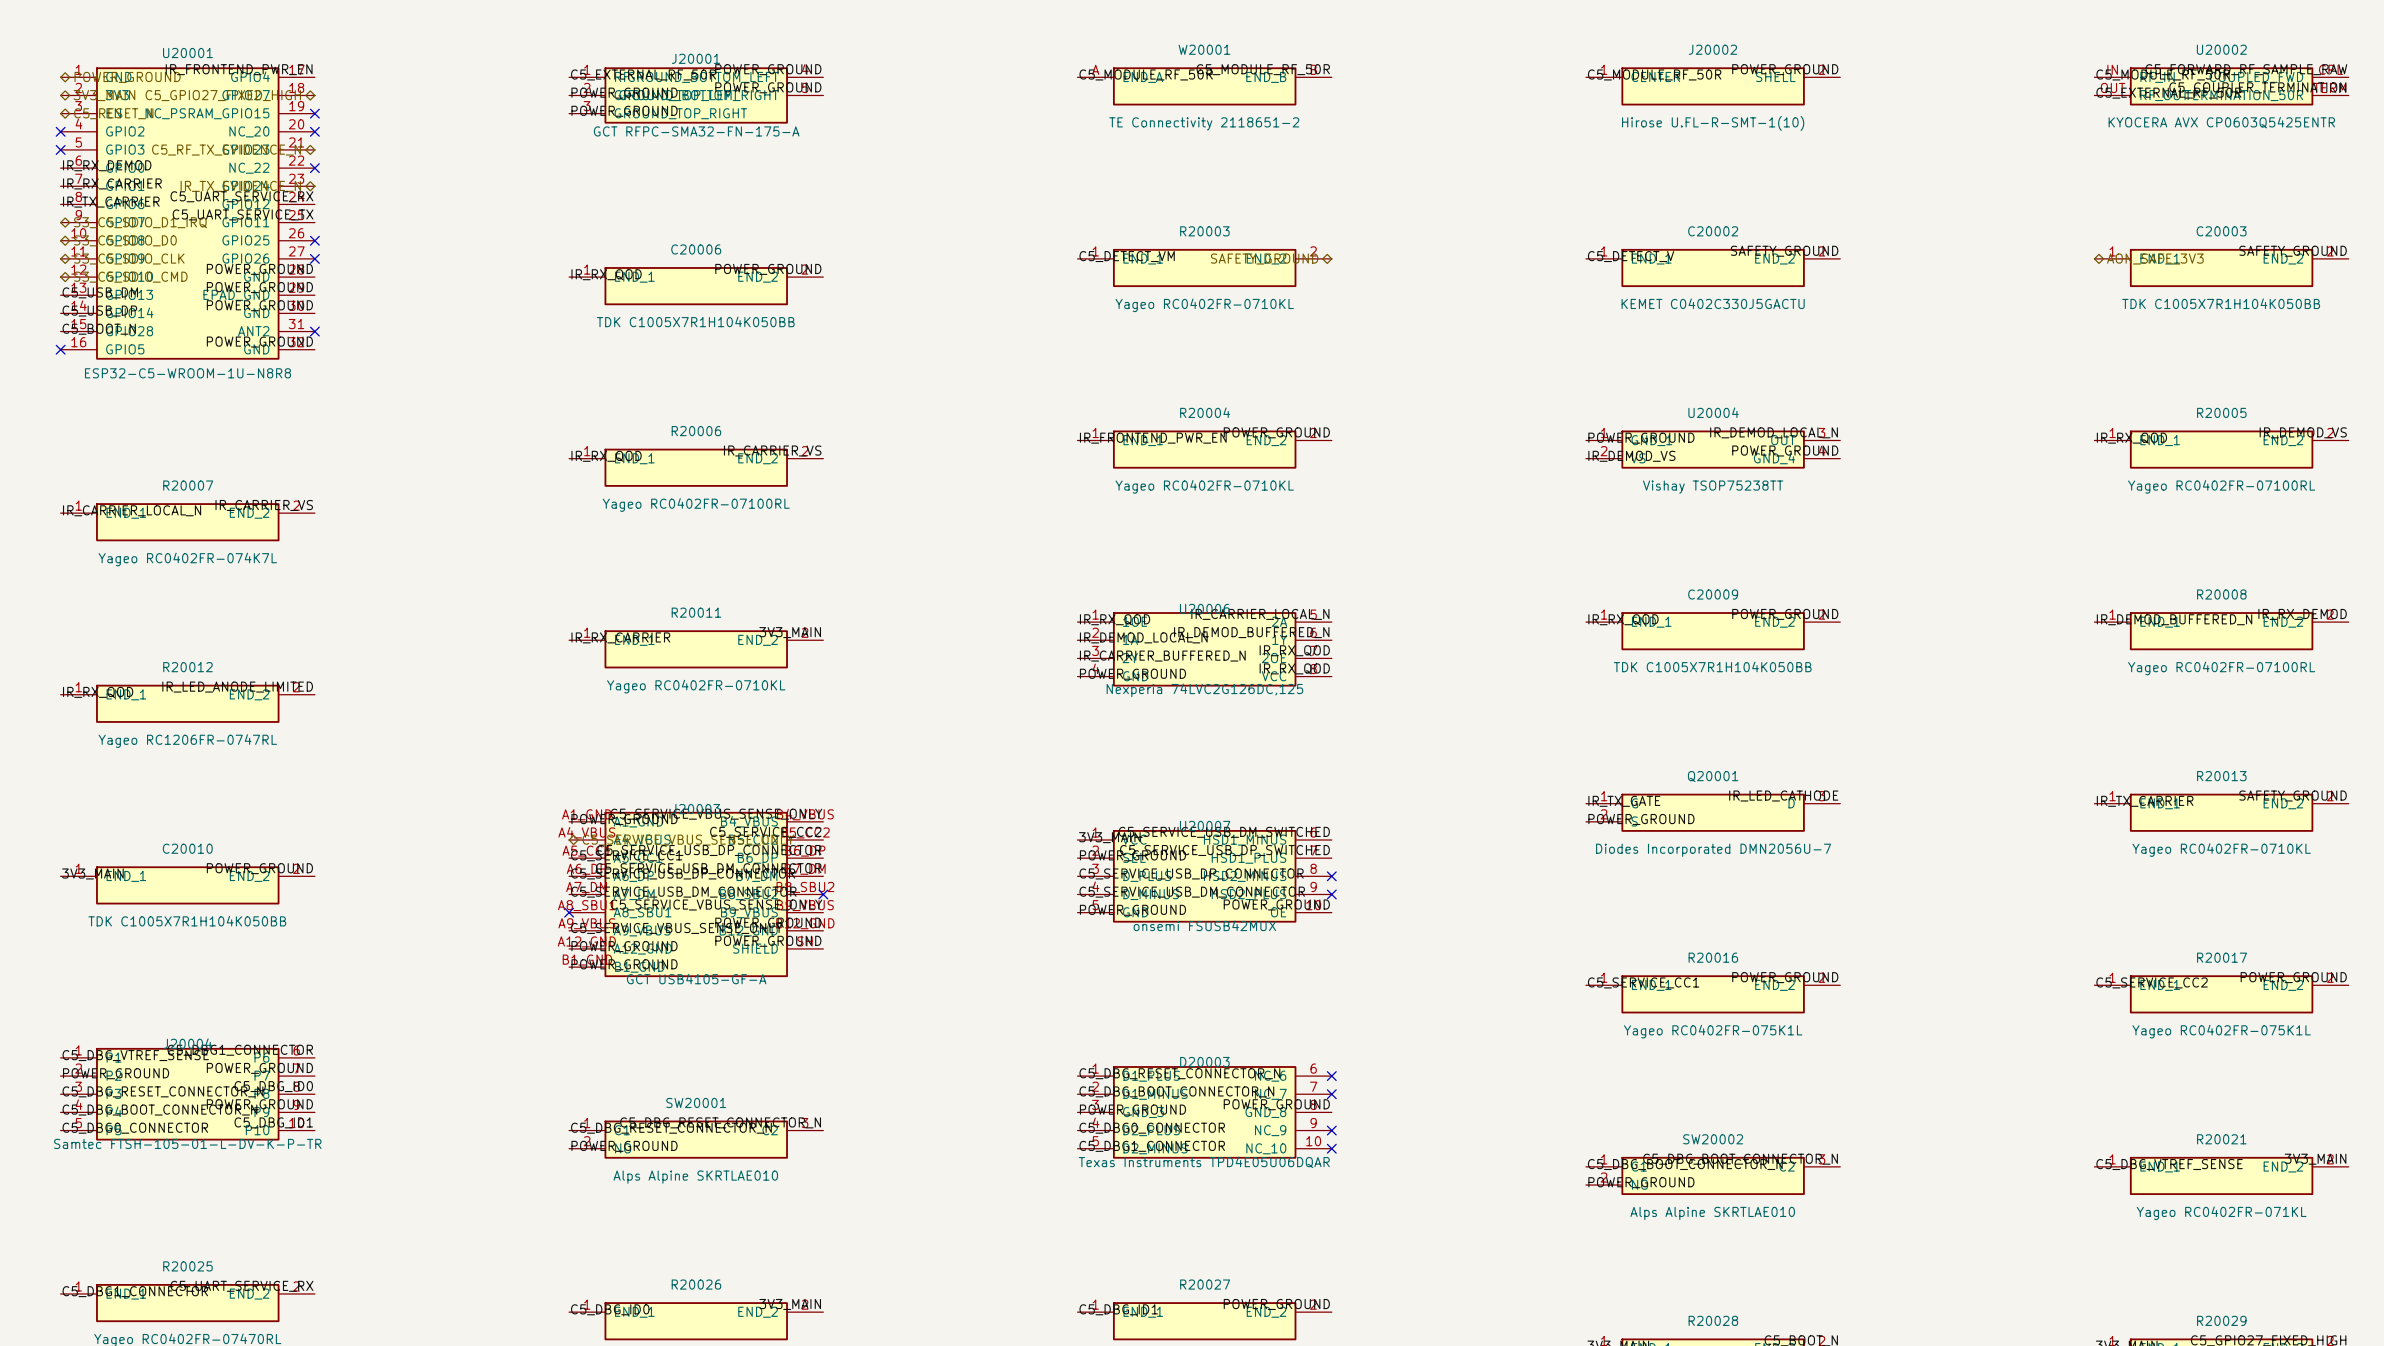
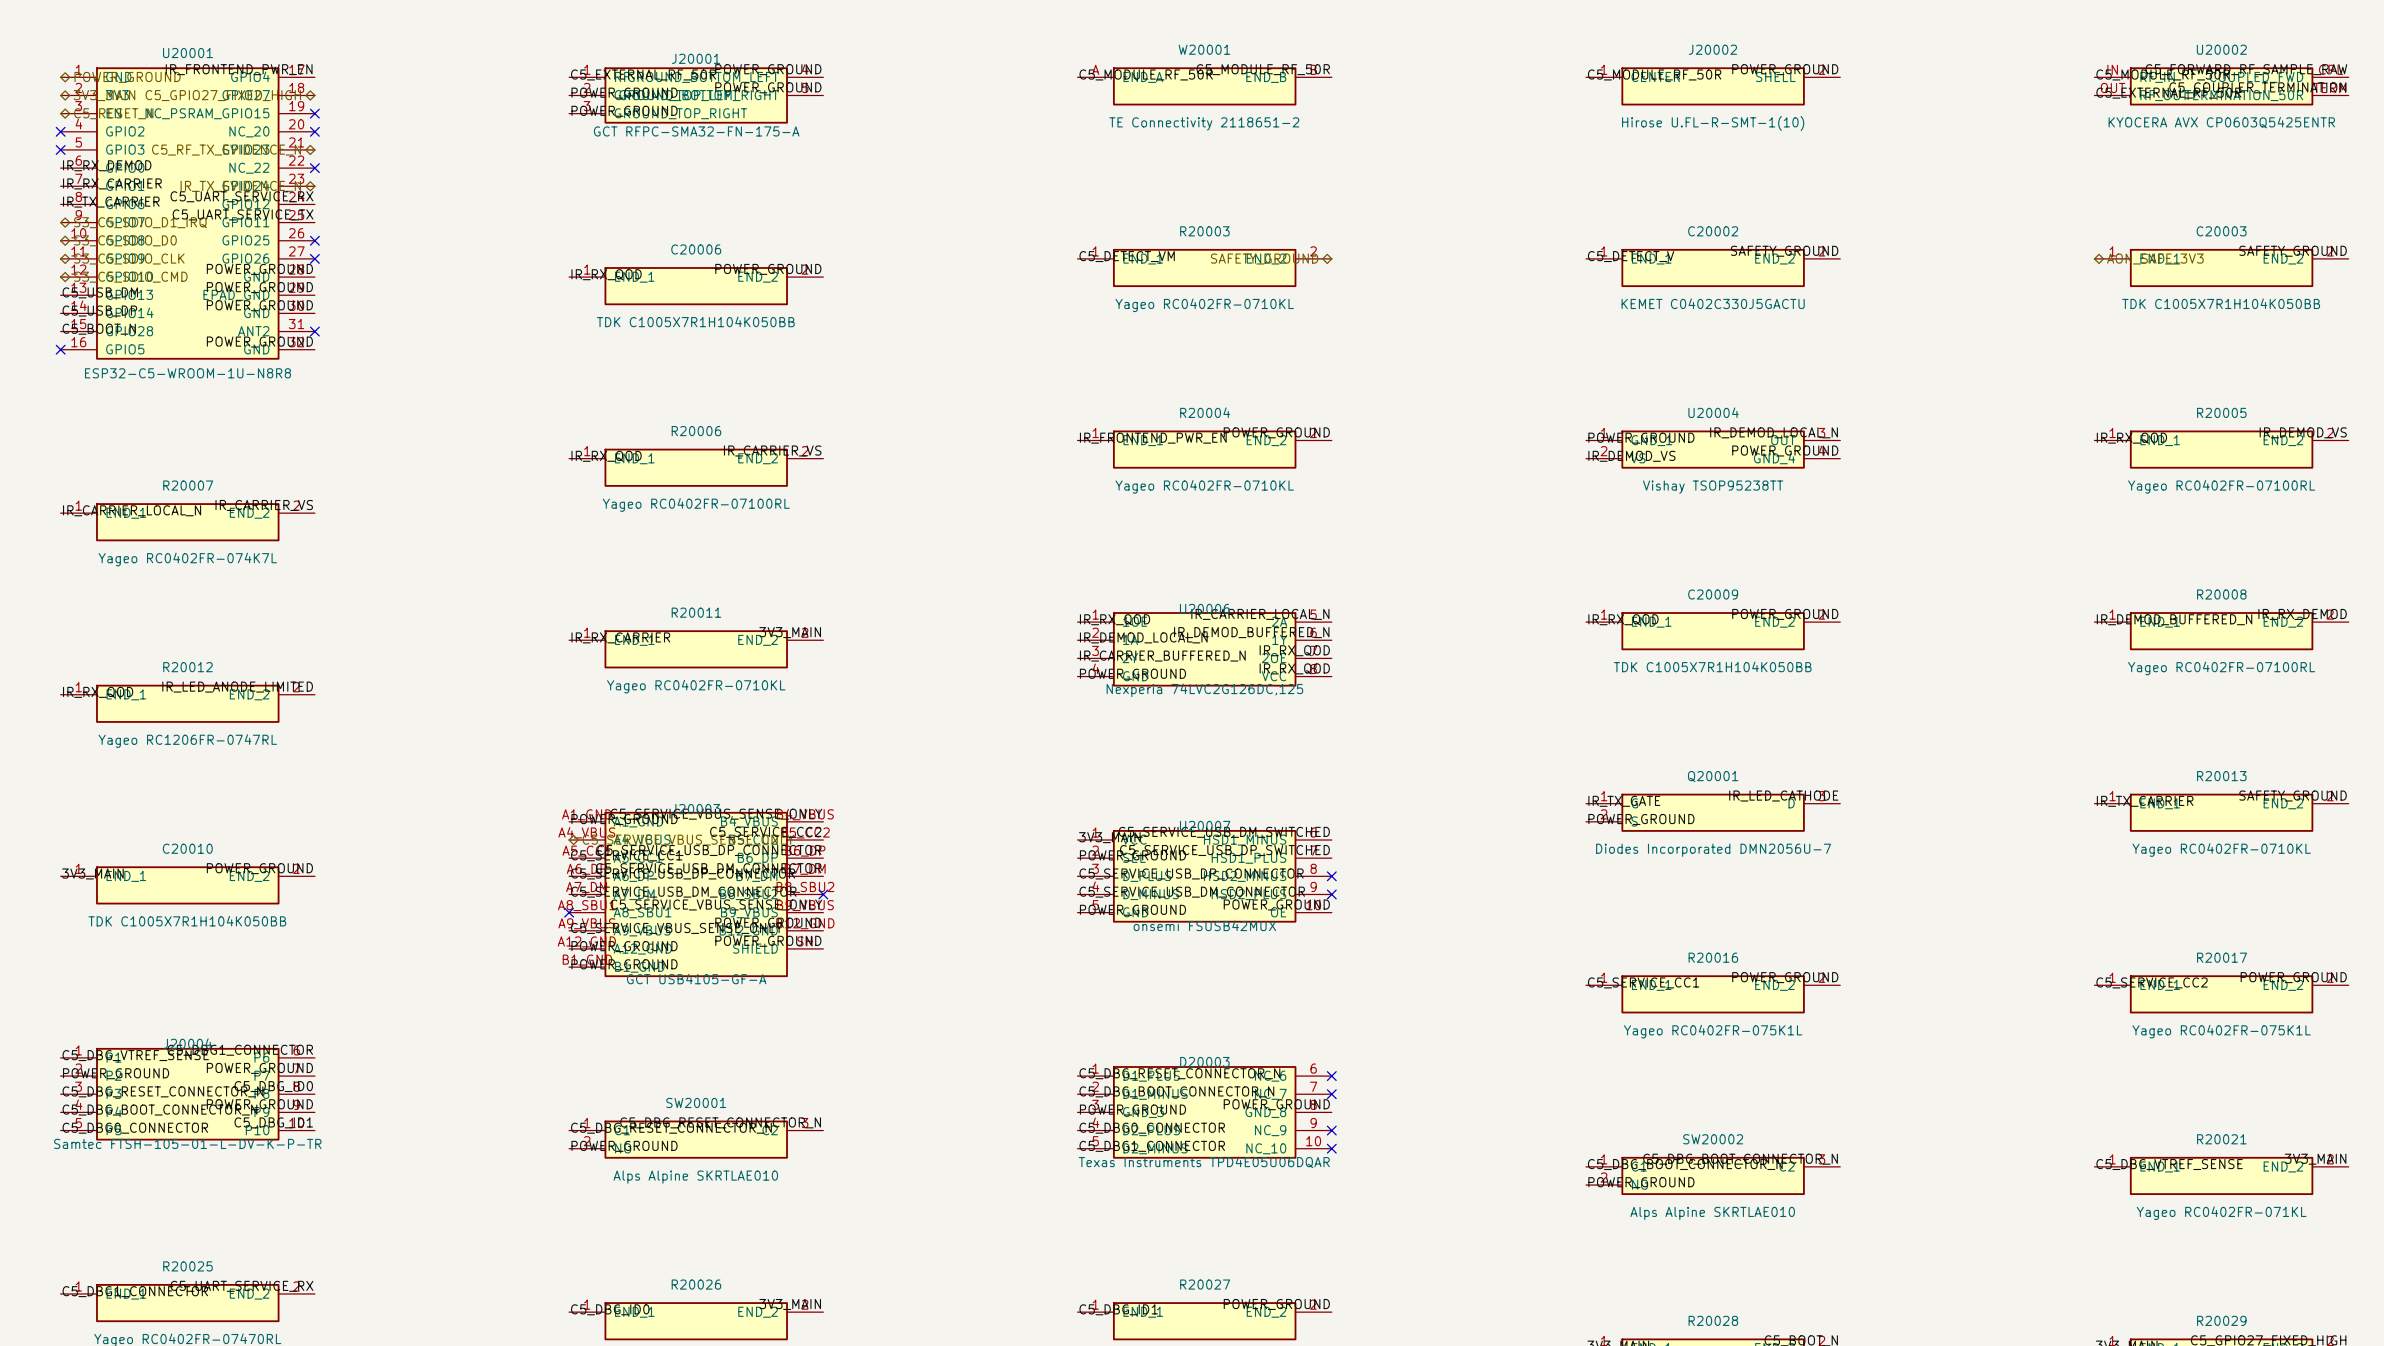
U20004 value: Vishay TSOP75238TT (1713, 487) -> Vishay TSOP95238TT (1713, 487)

